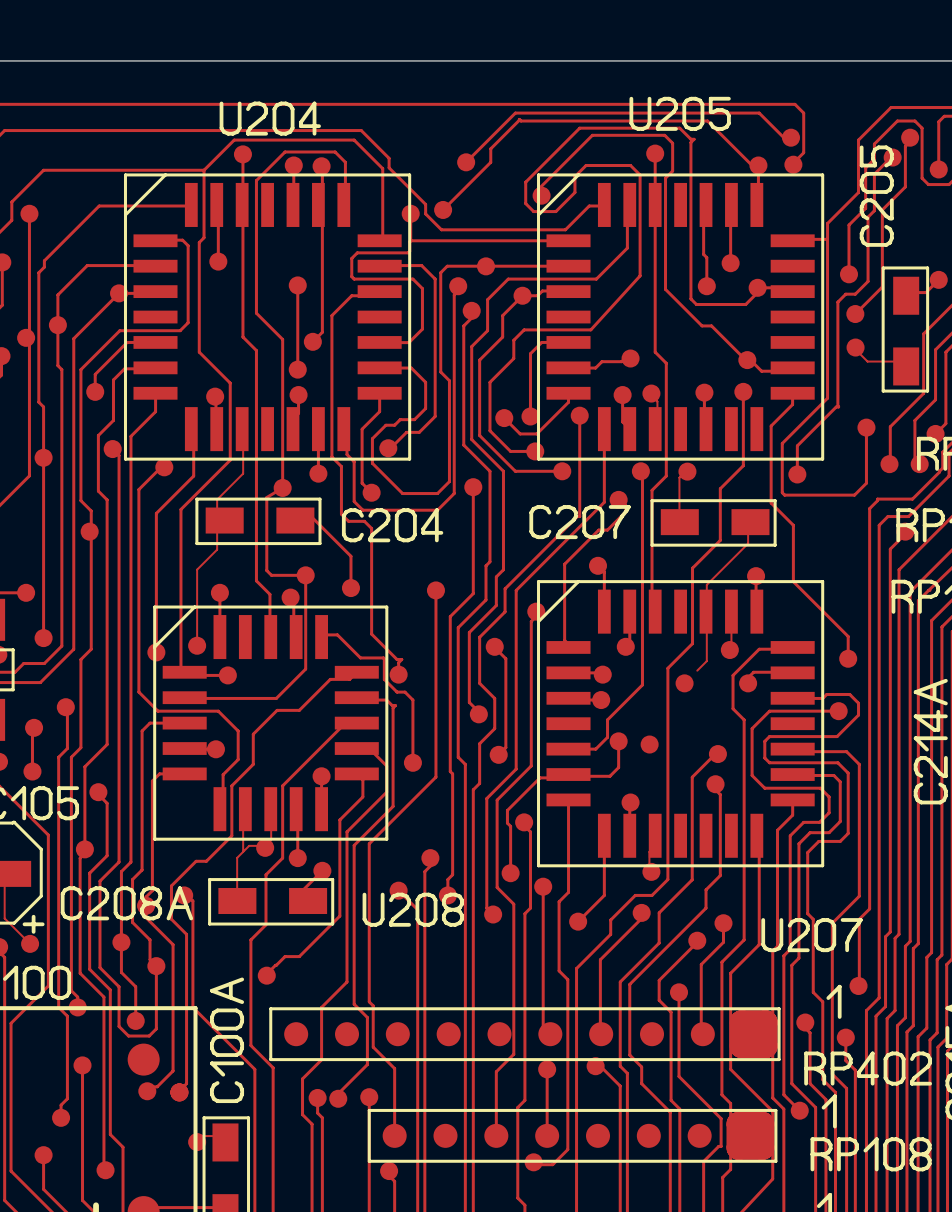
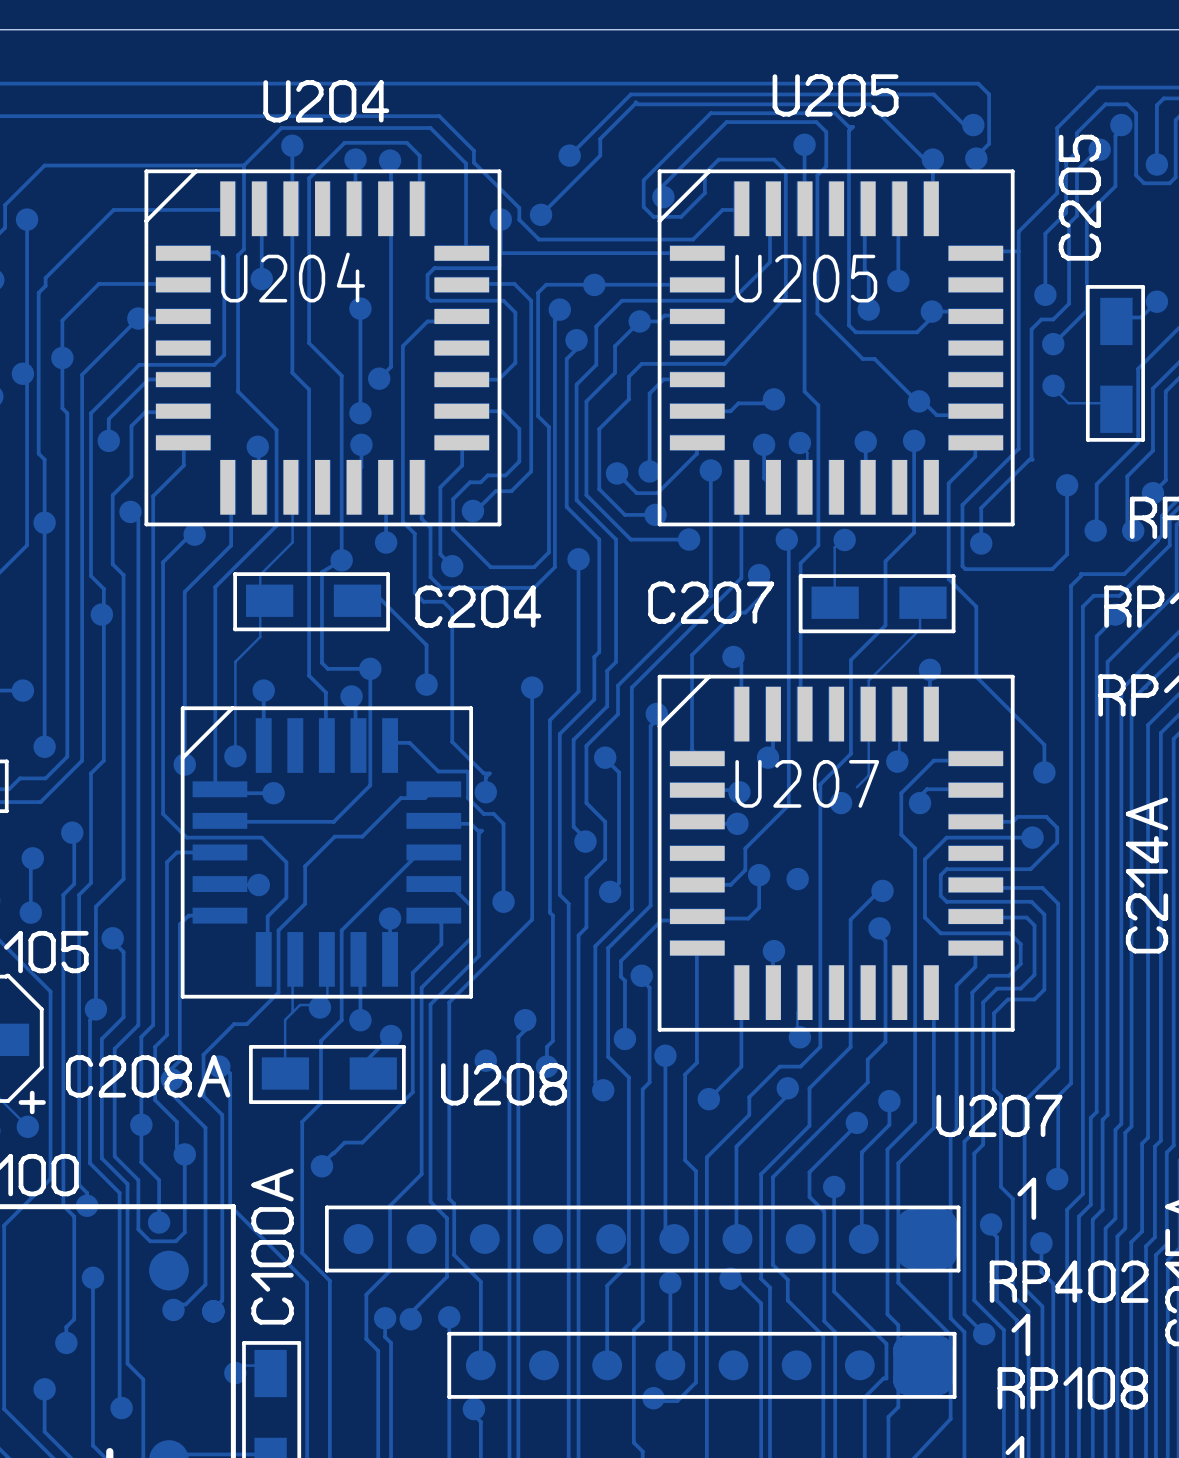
U204: none -> (322, 348)
U205: none -> (836, 348)
U207: none -> (836, 853)

